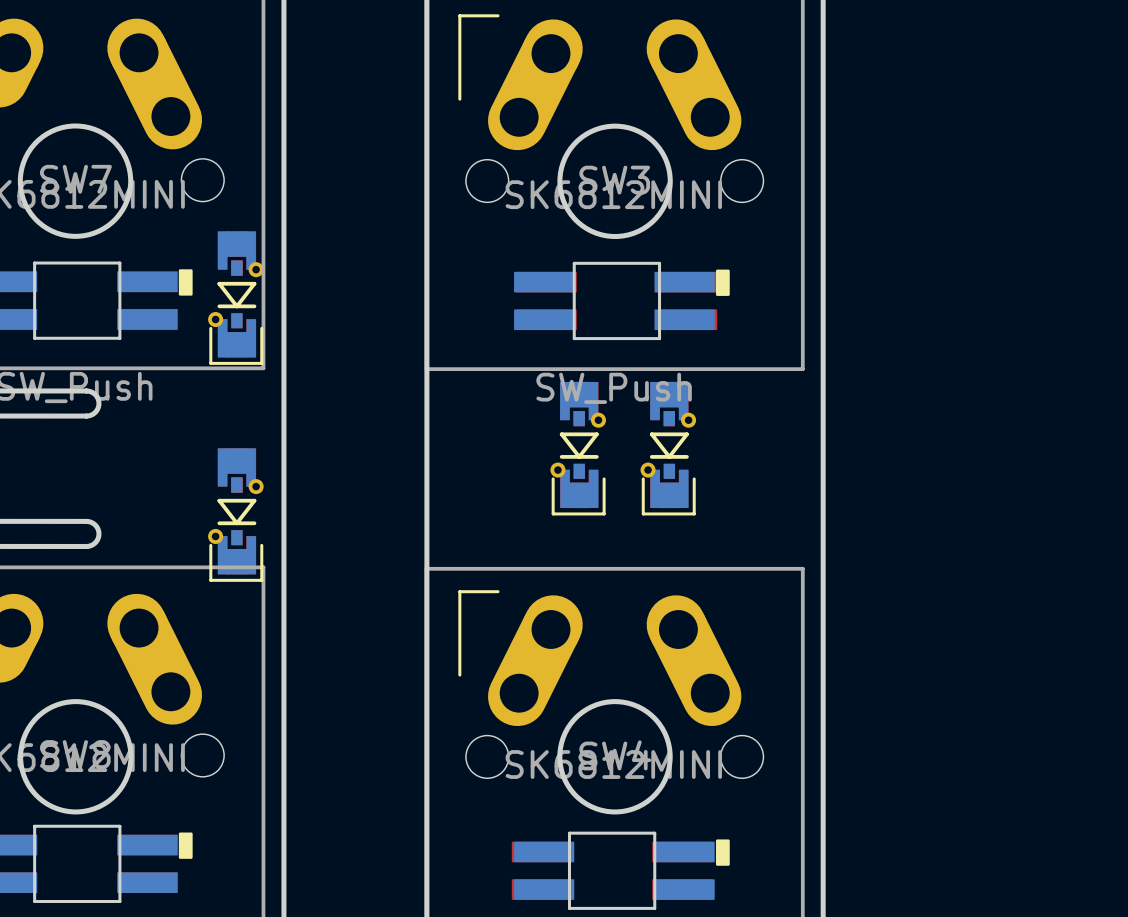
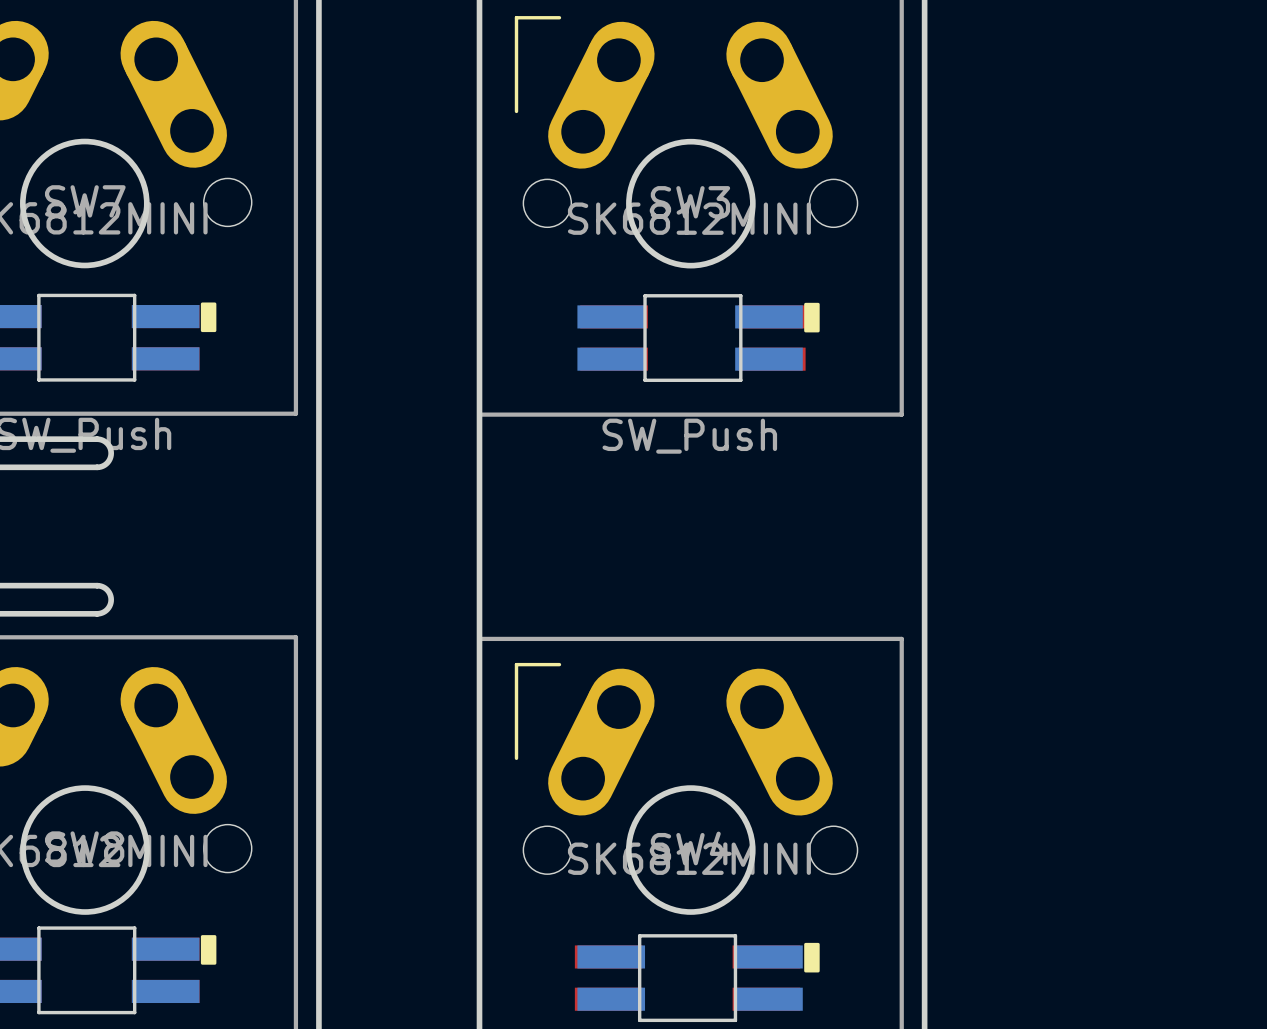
part: (235, 298) -> none
part: (578, 448) -> none
part: (668, 448) -> none
part: (235, 515) -> none

